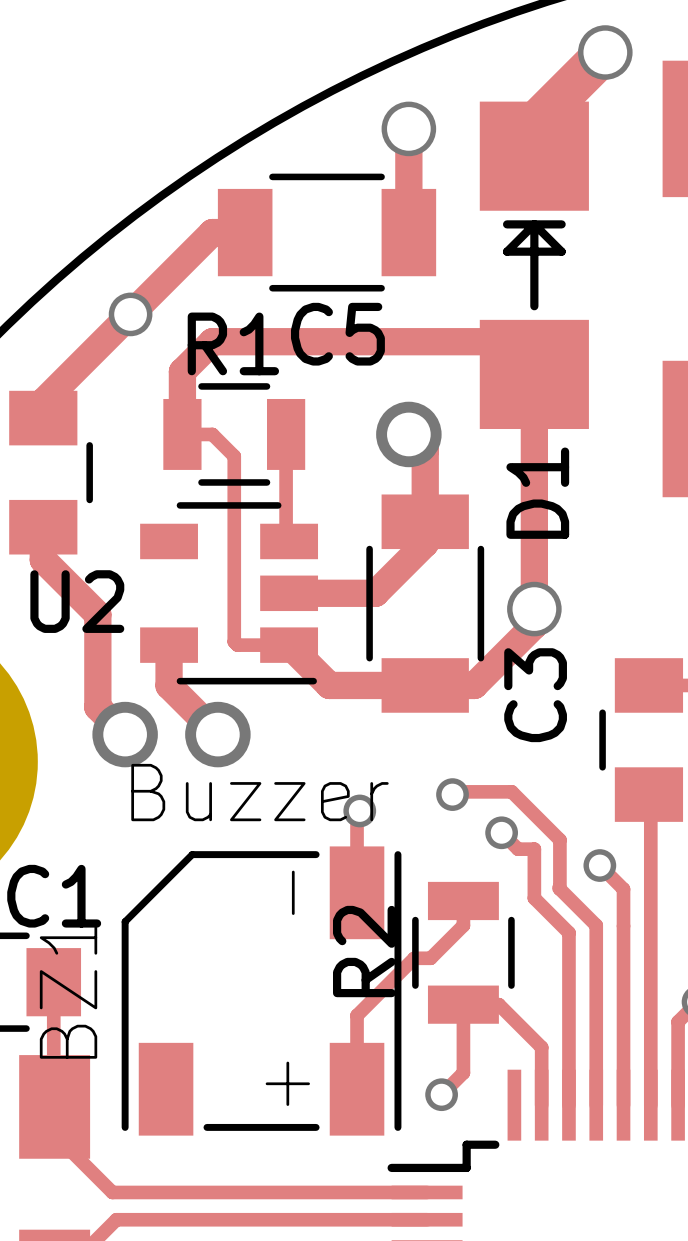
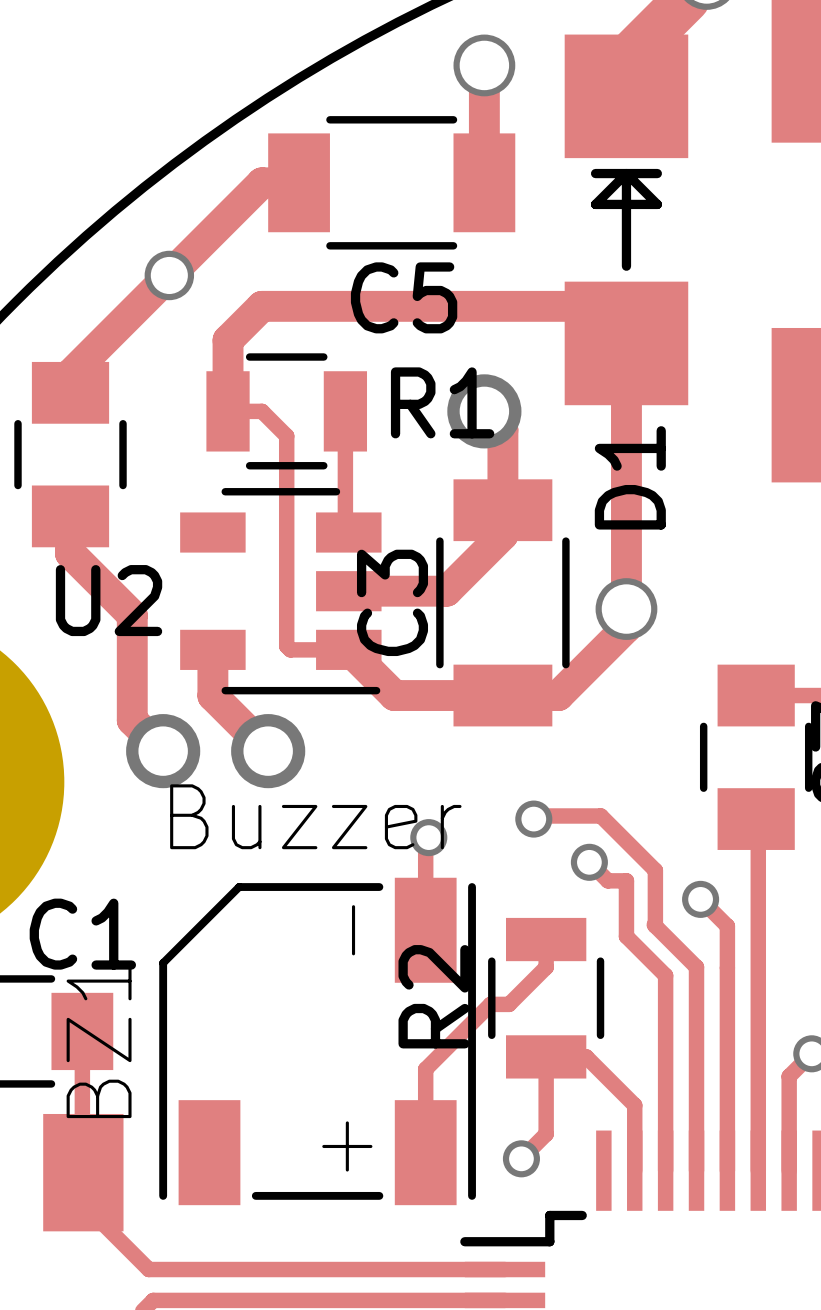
R1 name position: R1 (233, 343) -> R1 (442, 402)
C3 name position: C3 (535, 695) -> C3 (392, 602)

